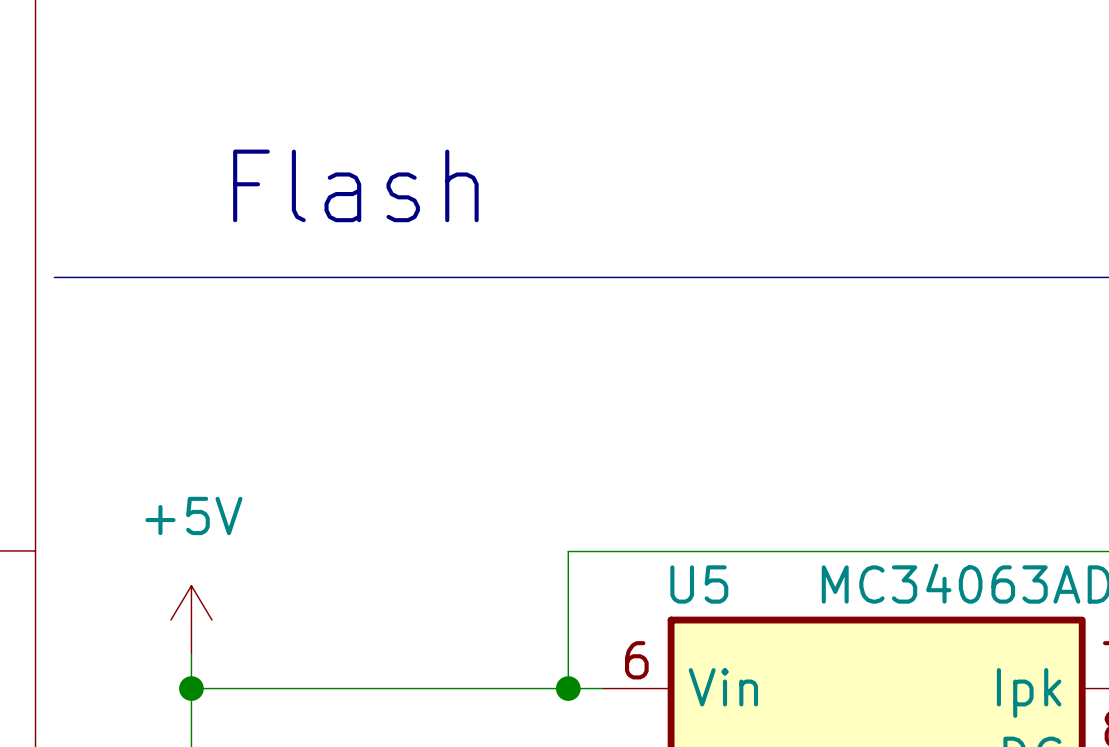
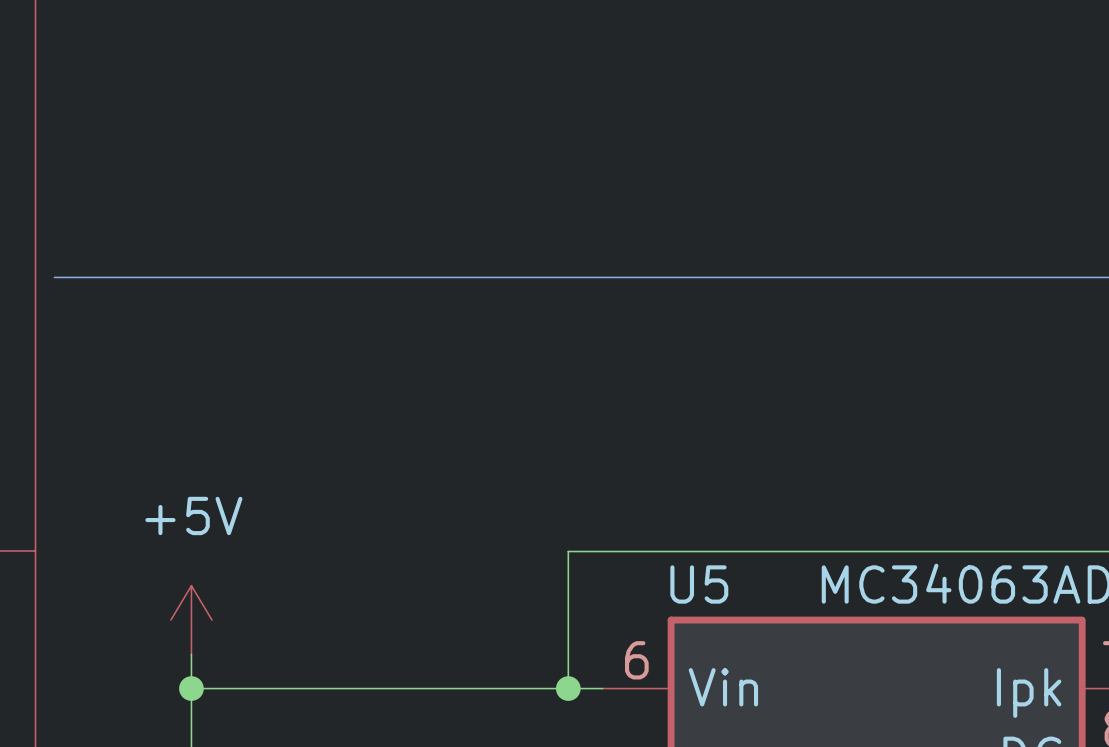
text: Flash (355, 185) -> none

